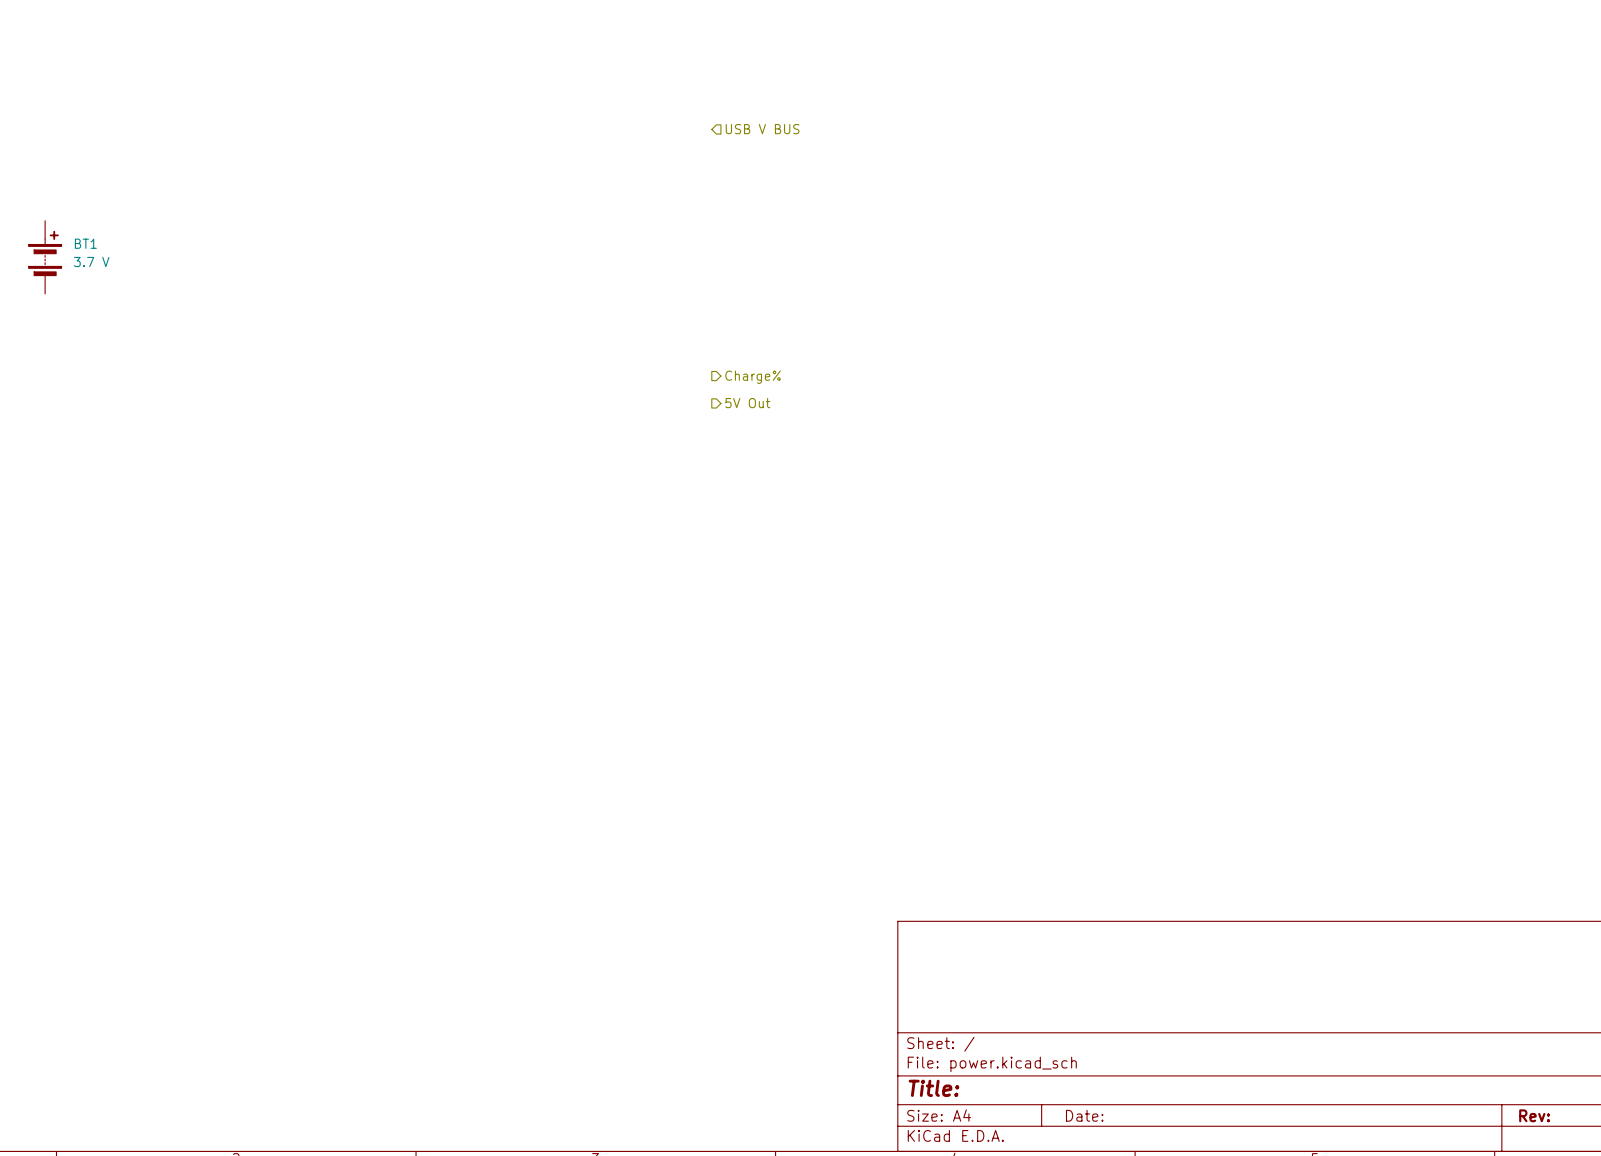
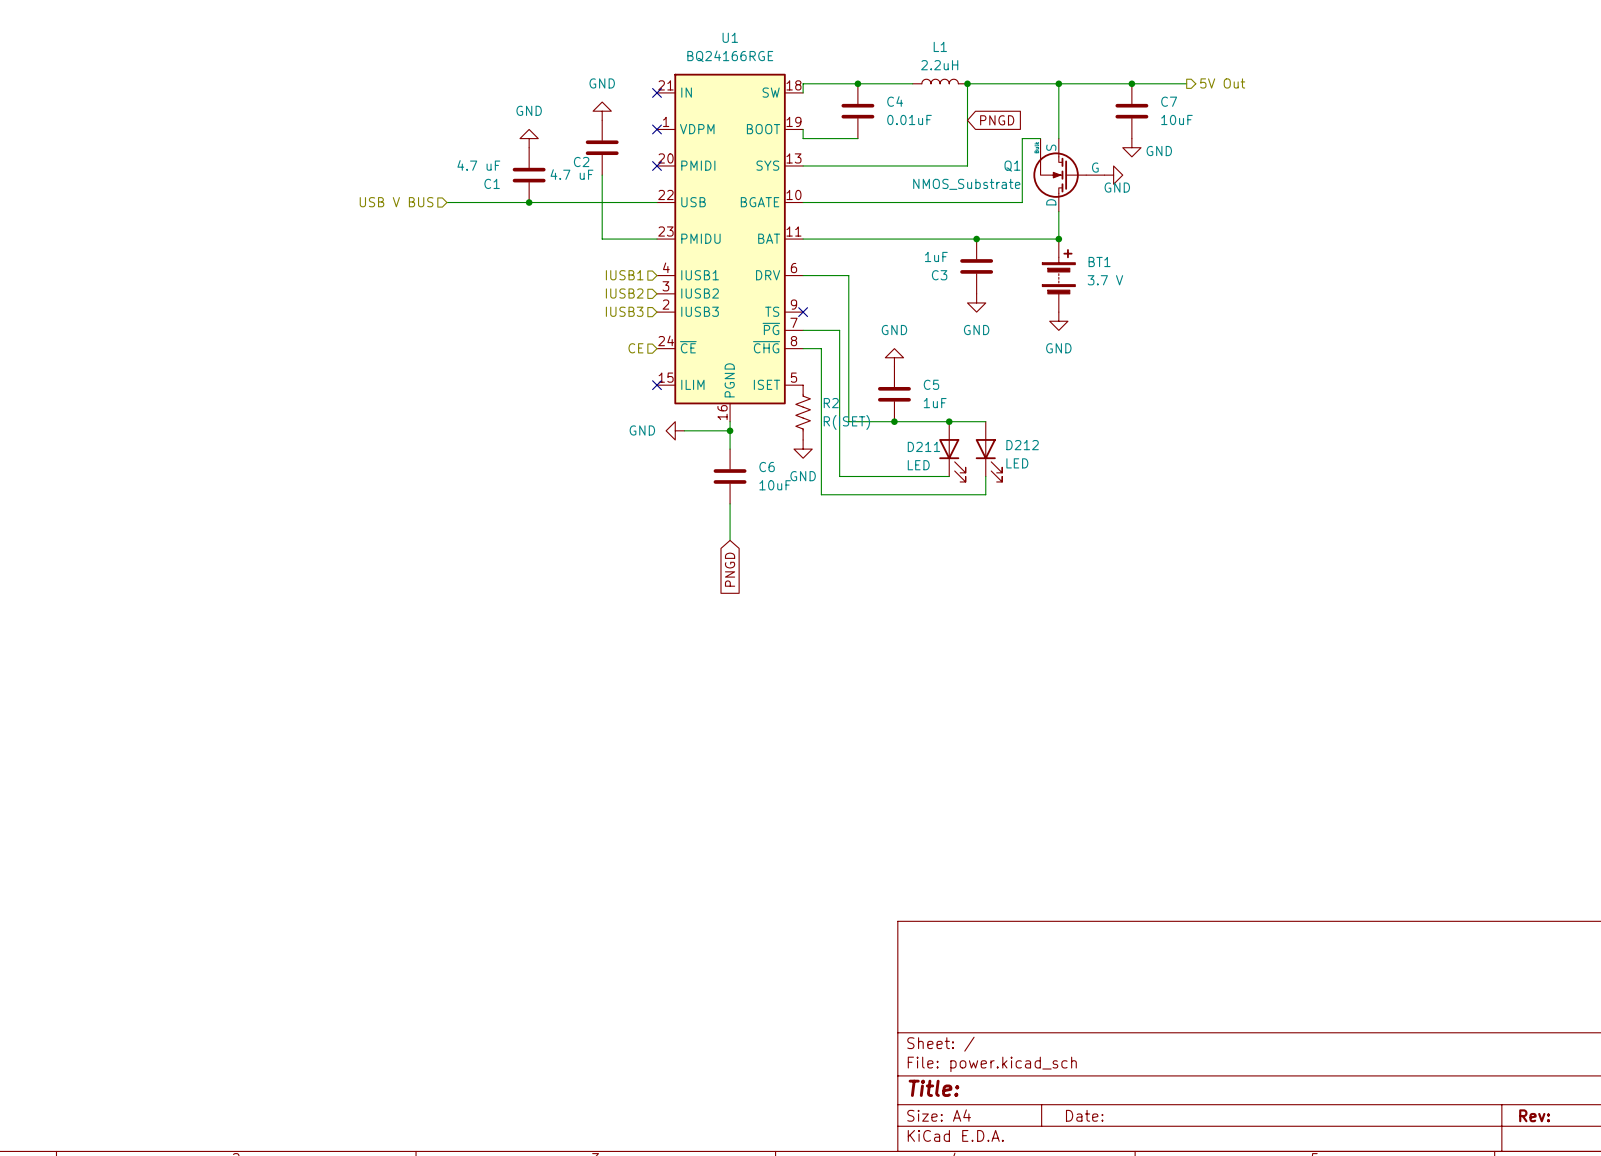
L1: none -> 2.2uH (940, 81)
junction: none -> (857, 83)
wire: none -> (912, 83) (803, 83) (803, 92)
junction: none -> (967, 83)
wire: none -> (1058, 83) (1058, 138)
junction: none -> (1058, 83)
junction: none -> (1131, 83)
wire: none -> (1186, 83) (967, 83) (967, 165) (803, 165)
hierarchical label: none -> 5V Out (1222, 83)
no-connect mark: none -> (656, 92)
power symbol: none -> GND (602, 111)
C4: none -> 0.01uF (857, 111)
C7: none -> 10uF (1131, 111)
global label: none -> PNGD (997, 120)
no-connect mark: none -> (656, 129)
hierarchical label: USB V BUS (762, 129) -> none
wire: none -> (803, 129) (803, 138) (857, 138)
power symbol: none -> GND (529, 138)
wire: none -> (1040, 138) (1022, 138) (1022, 202) (803, 202)
C2: none -> 4.7 uF (602, 147)
power symbol: none -> GND (1131, 147)
no-connect mark: none -> (656, 165)
C1: none -> 4.7 uF (529, 175)
wire: none -> (602, 175) (602, 239) (656, 239)
Q1: none -> NMOS_Substrate (1068, 175)
power symbol: none -> GND (1113, 175)
hierarchical label: none -> USB V BUS (396, 202)
wire: none -> (446, 202) (656, 202)
junction: none -> (529, 202)
wire: none -> (1058, 211) (1058, 239) (803, 239)
junction: none -> (976, 239)
junction: none -> (1058, 239)
U1: none -> BQ24166RGE (730, 247)
BT1 position: (45, 257) -> (1058, 275)
C3: none -> 1uF (976, 266)
hierarchical label: none -> IUSB1 (624, 275)
wire: none -> (803, 275) (848, 275) (848, 421) (985, 421)
hierarchical label: none -> IUSB2 (624, 293)
power symbol: none -> GND (976, 302)
hierarchical label: none -> IUSB3 (624, 311)
no-connect mark: none -> (803, 312)
power symbol: none -> GND (1058, 321)
wire: none -> (803, 330) (839, 330) (839, 476) (949, 476)
hierarchical label: none -> CE (635, 348)
wire: none -> (803, 348) (821, 348) (821, 494) (985, 494) (985, 476)
power symbol: none -> GND (894, 357)
hierarchical label: Charge% (753, 377) -> none
no-connect mark: none -> (656, 385)
C5: none -> 1uF (894, 394)
hierarchical label: 5V Out (747, 403) -> none
R2: none -> R(ISET) (803, 412)
wire: none -> (730, 421) (730, 449)
junction: none -> (894, 421)
junction: none -> (949, 421)
power symbol: none -> GND (675, 430)
wire: none -> (684, 430) (730, 430)
junction: none -> (730, 430)
power symbol: none -> GND (803, 449)
D211: none -> LED (952, 451)
D212: none -> LED (988, 451)
C6: none -> 10uF (730, 476)
wire: none -> (730, 503) (730, 540)
global label: none -> PNGD (730, 569)

